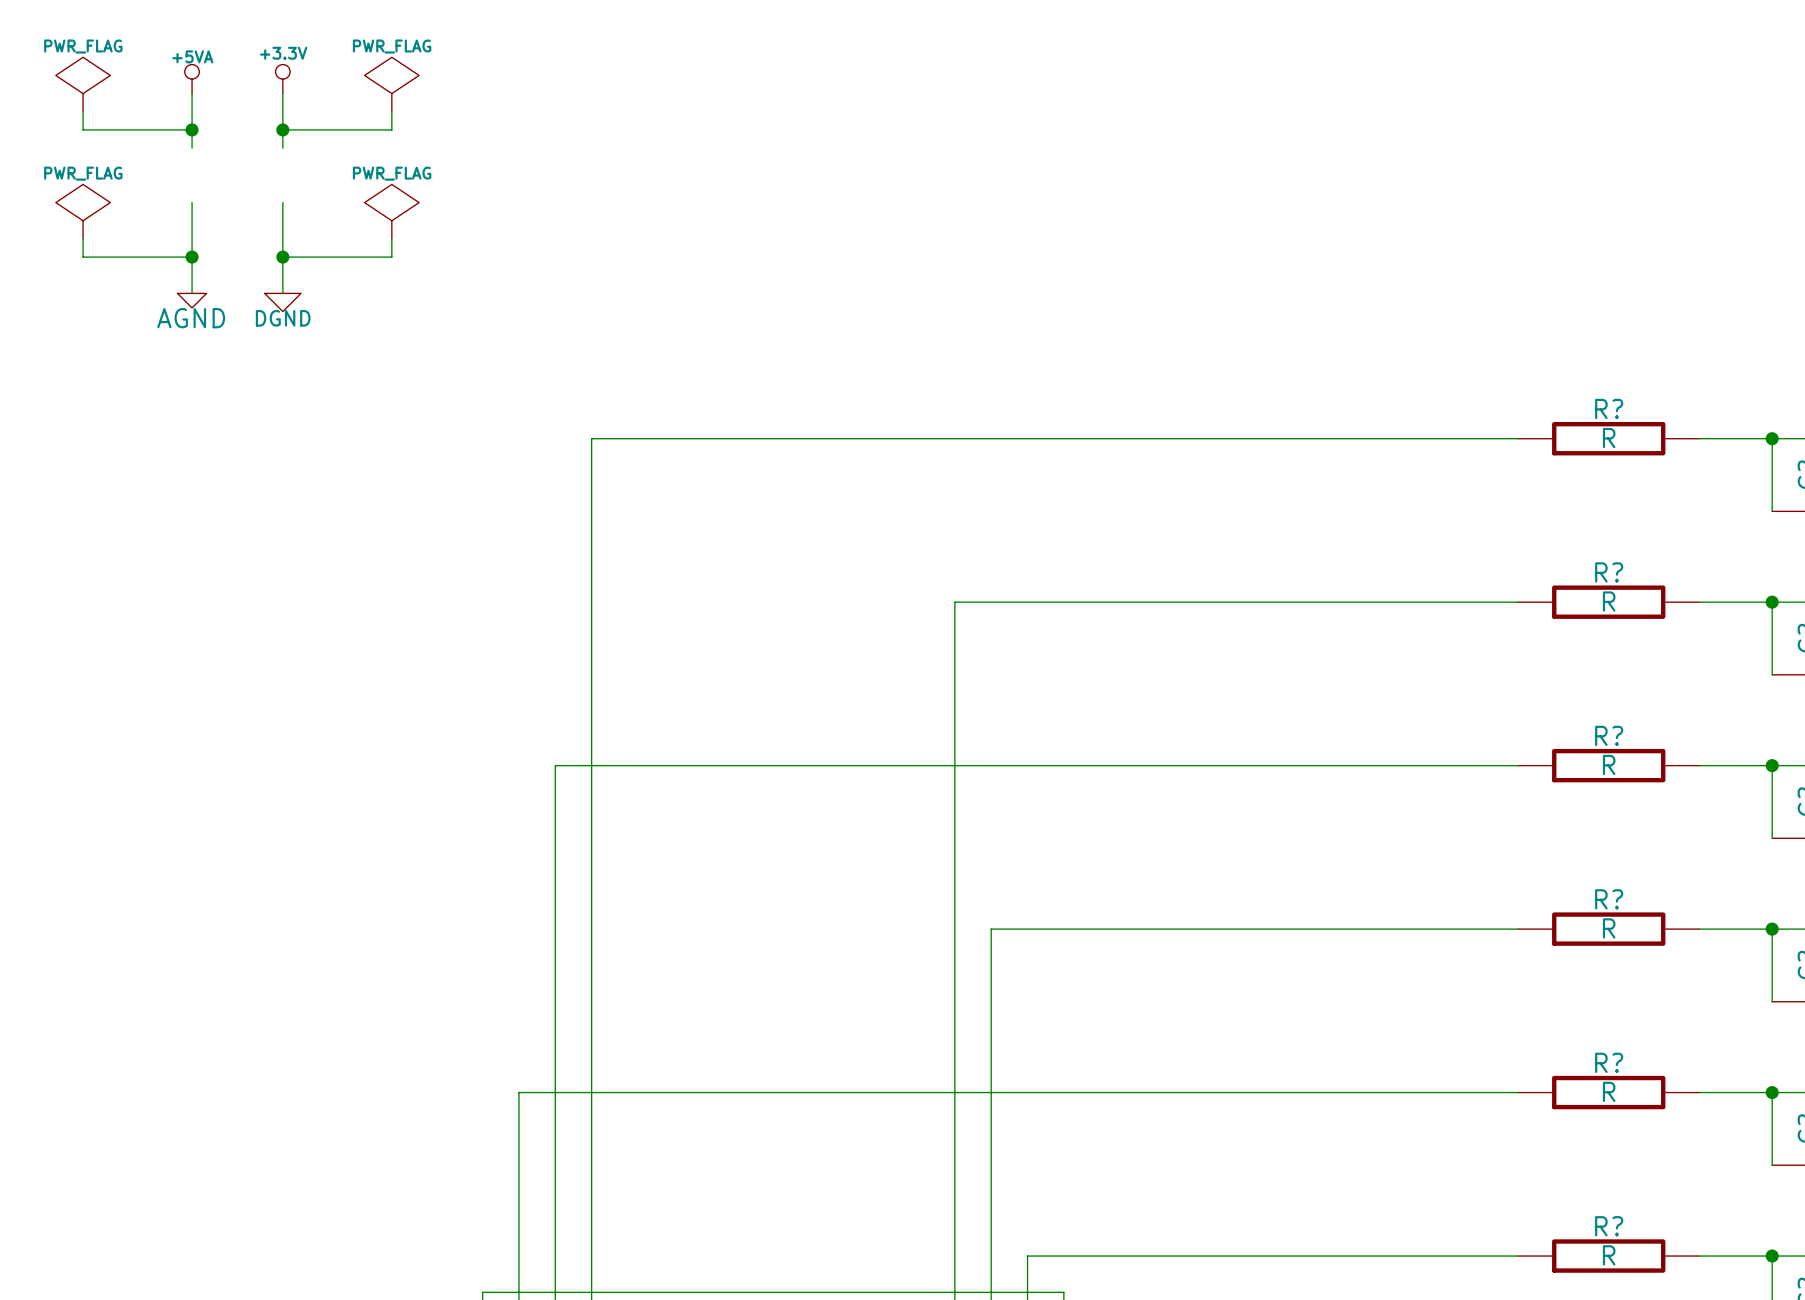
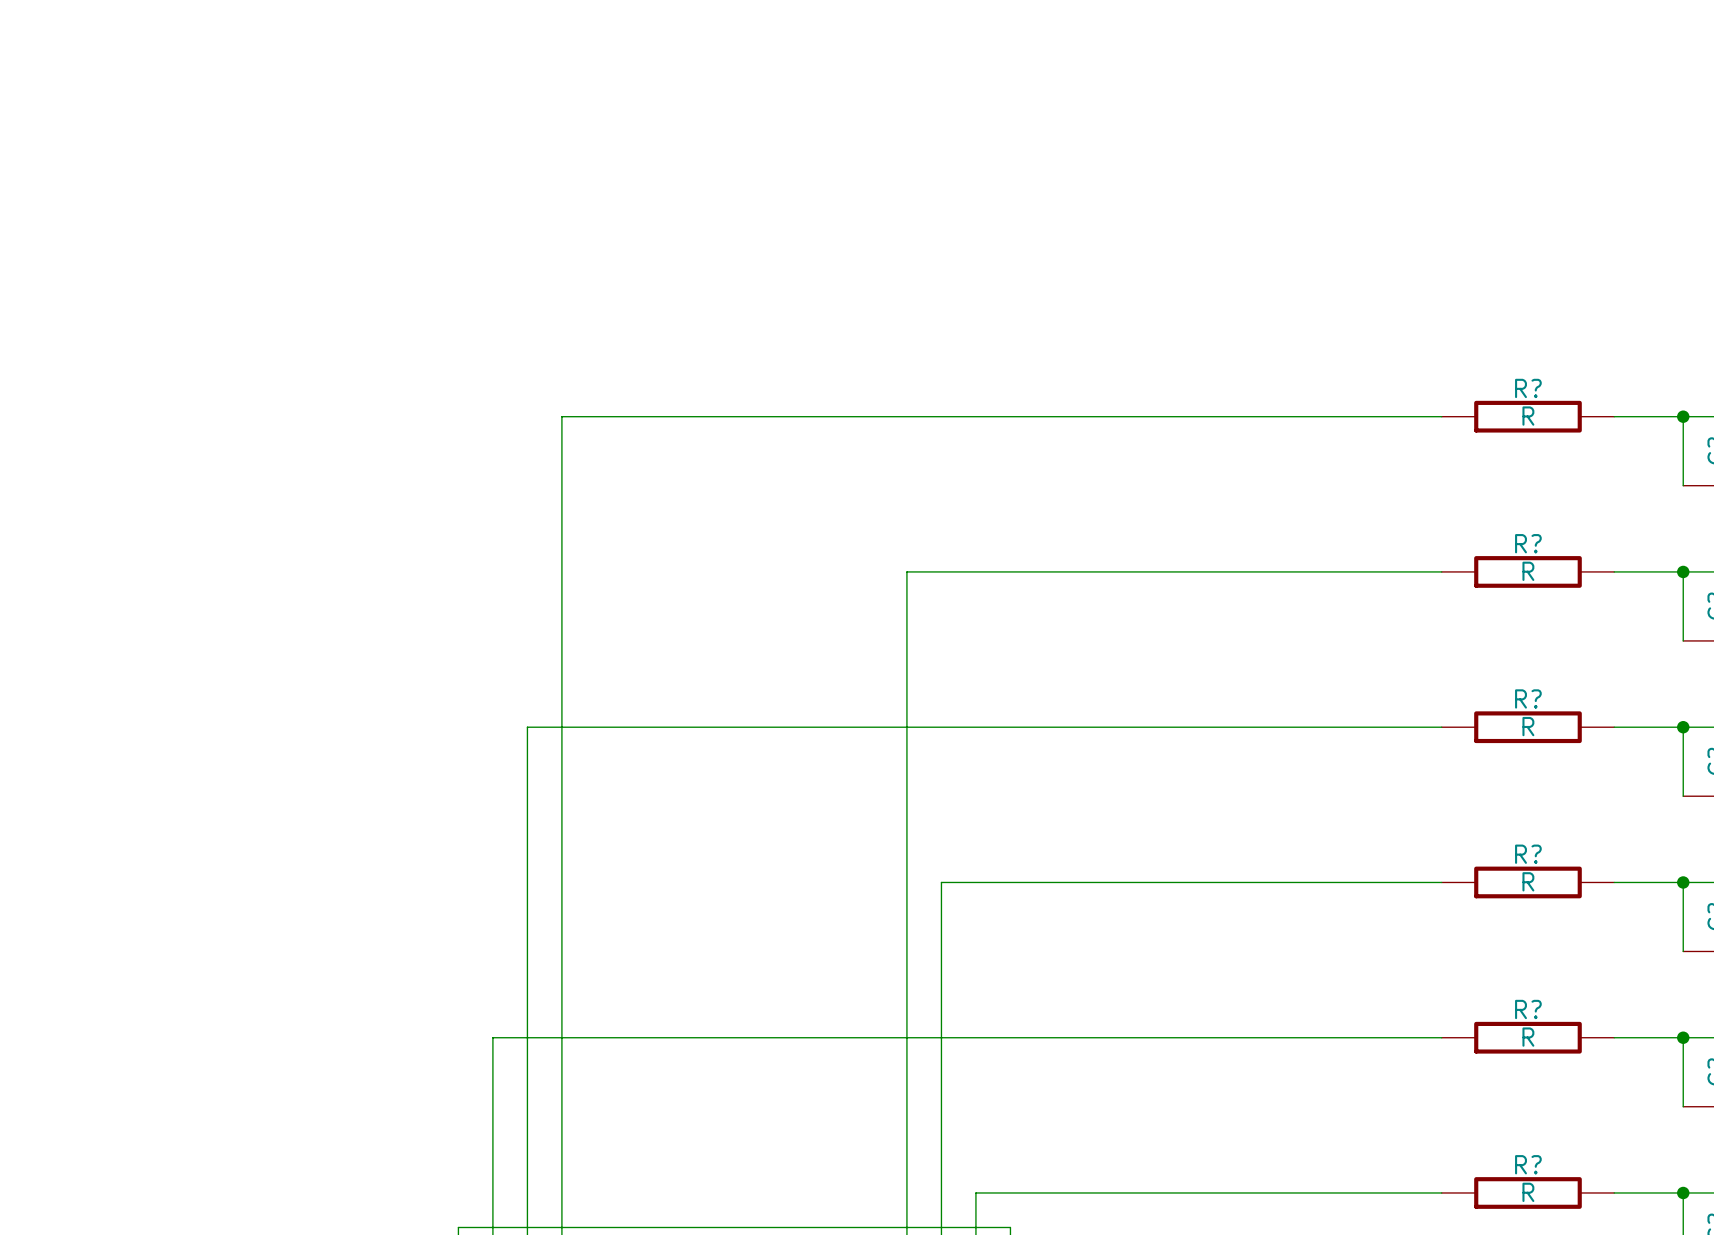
power symbol: +5VA (192, 79) -> none
power symbol: +3.3V (282, 79) -> none
power symbol: PWR_FLAG (83, 84) -> none
power symbol: PWR_FLAG (391, 84) -> none
wire: (192, 93) (192, 148) -> none
wire: (282, 93) (282, 148) -> none
wire: (83, 111) (83, 129) (192, 129) -> none
wire: (391, 111) (391, 129) (282, 129) -> none
junction: (192, 129) -> none
junction: (282, 129) -> none
wire: (192, 202) (192, 293) -> none
wire: (282, 202) (282, 293) -> none
power symbol: PWR_FLAG (83, 211) -> none
power symbol: PWR_FLAG (391, 211) -> none
wire: (83, 238) (83, 257) (192, 257) -> none
wire: (391, 238) (391, 257) (282, 257) -> none
junction: (192, 257) -> none
junction: (282, 257) -> none
power symbol: AGND (192, 300) -> none
power symbol: DGND (282, 302) -> none

